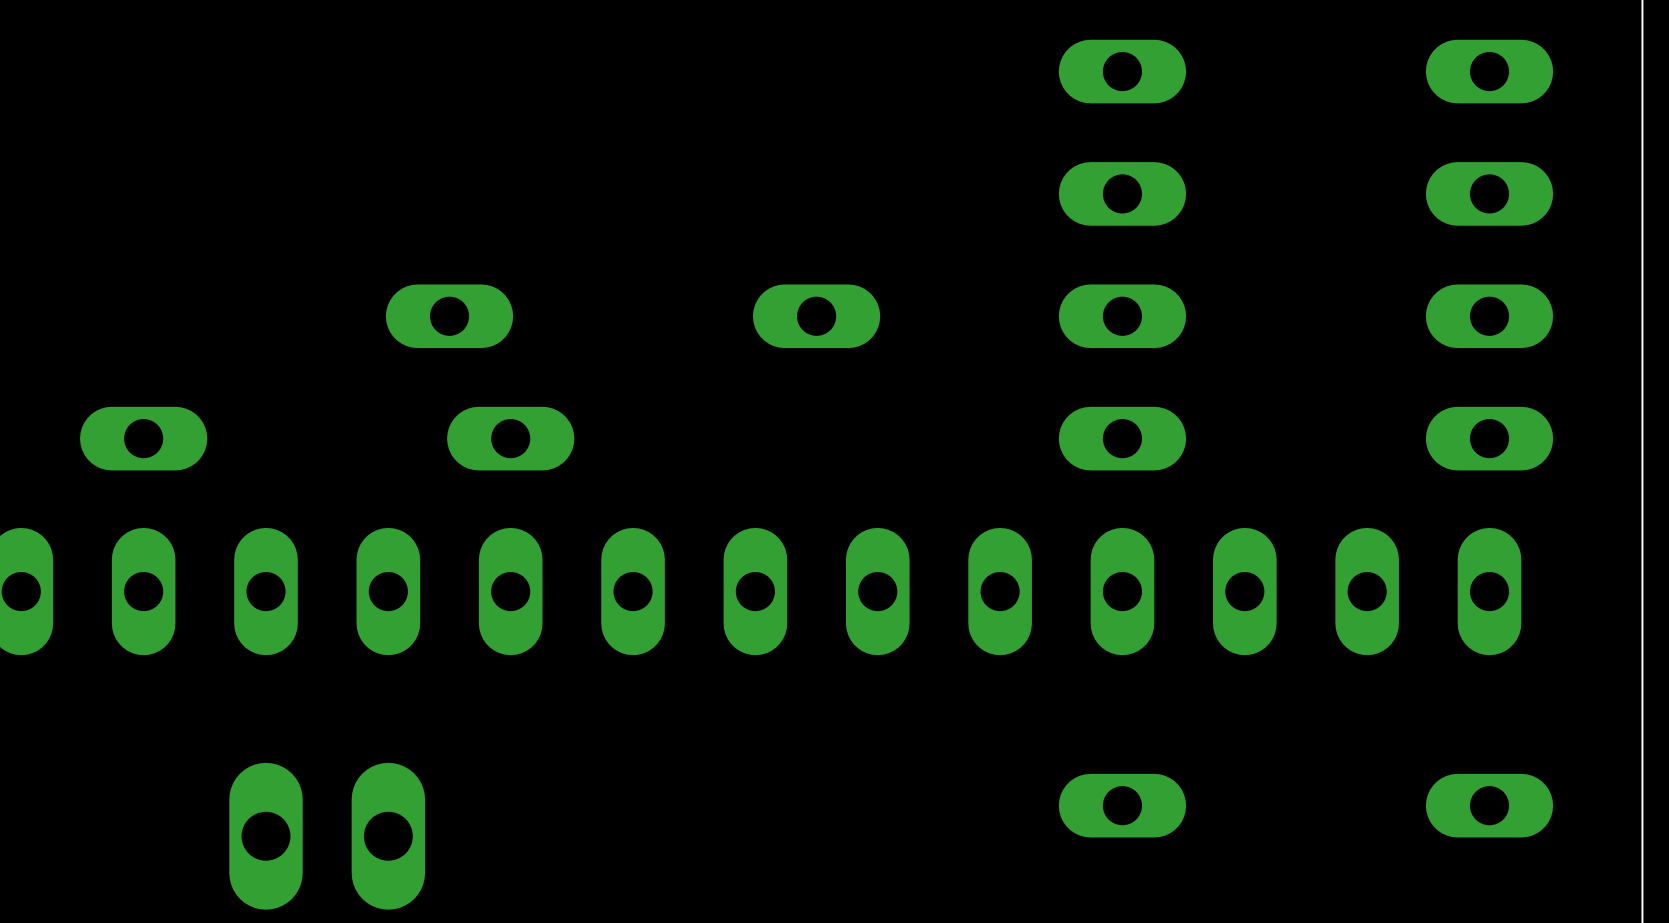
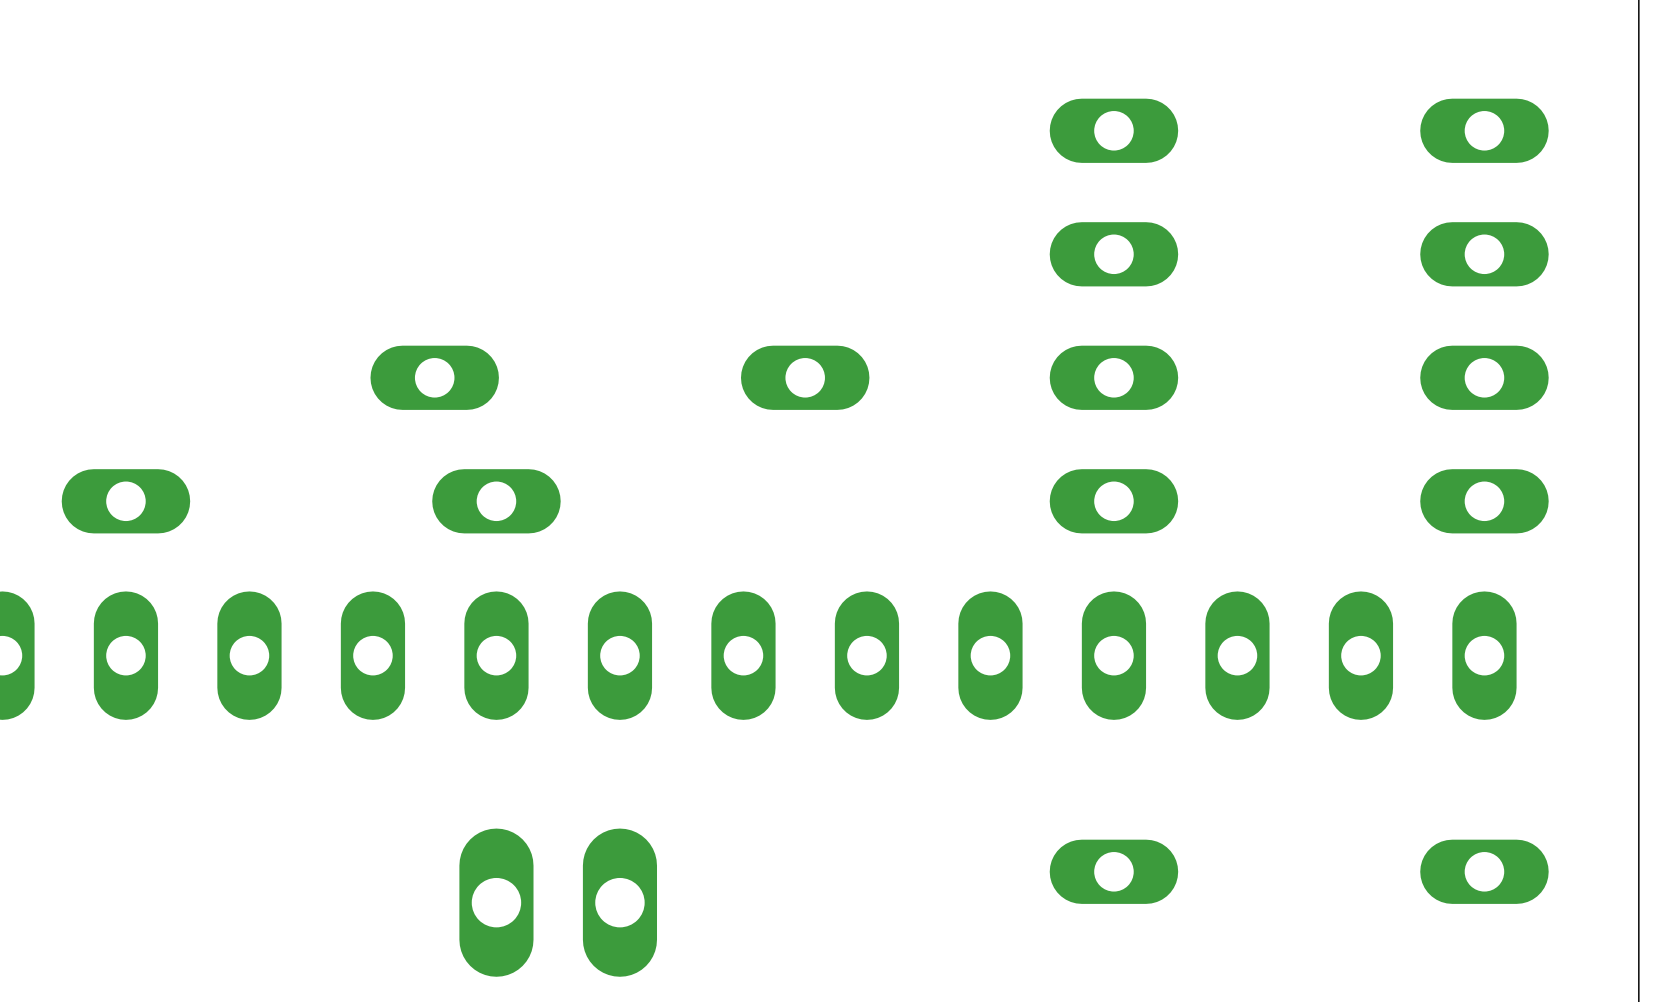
part position: (327, 836) -> (558, 902)

